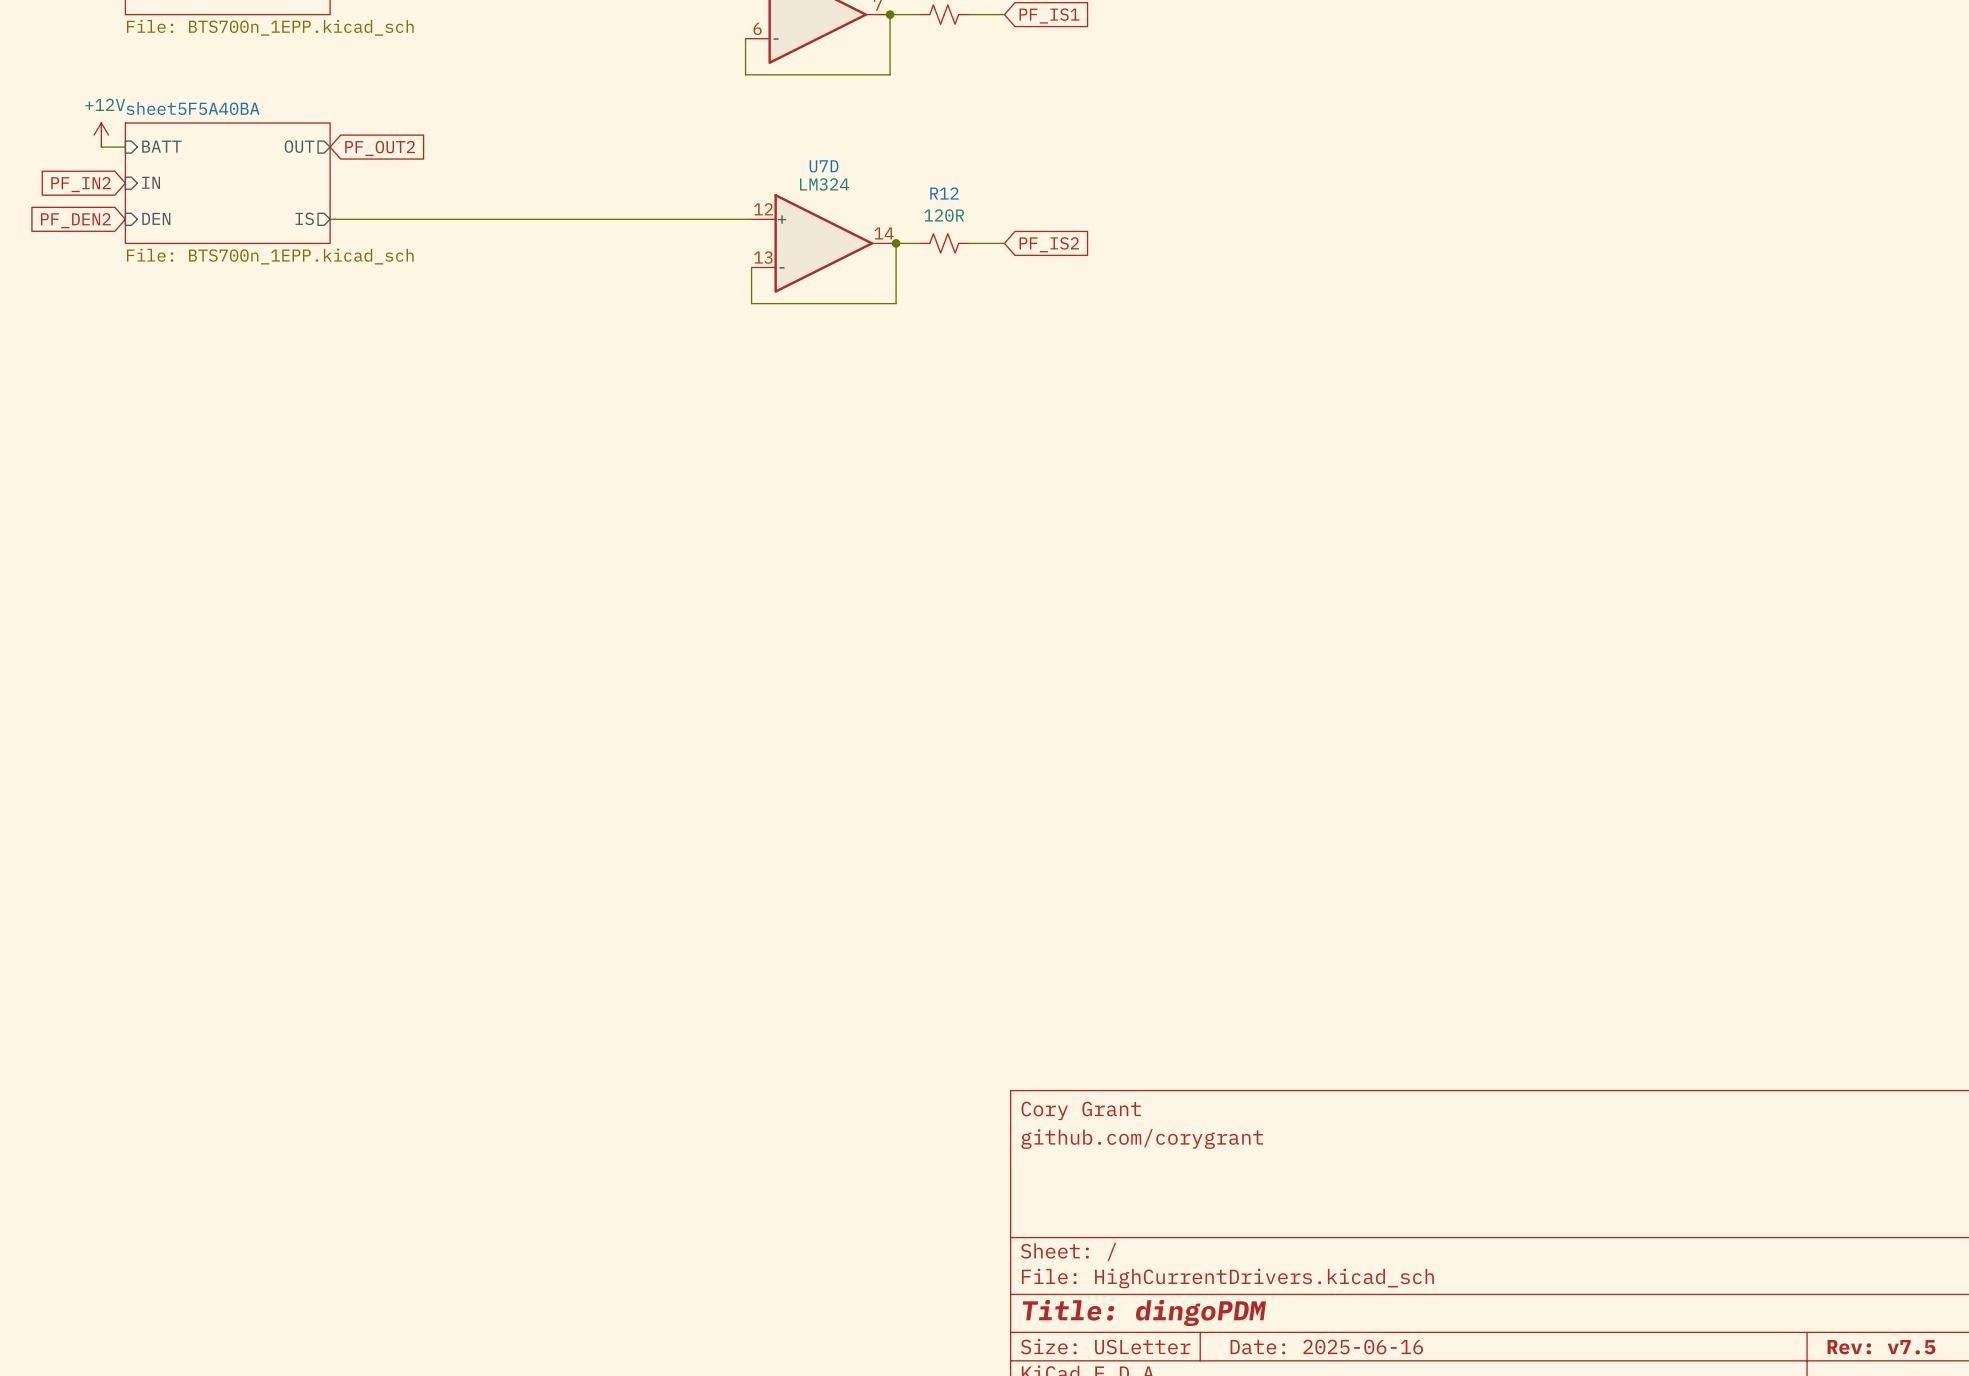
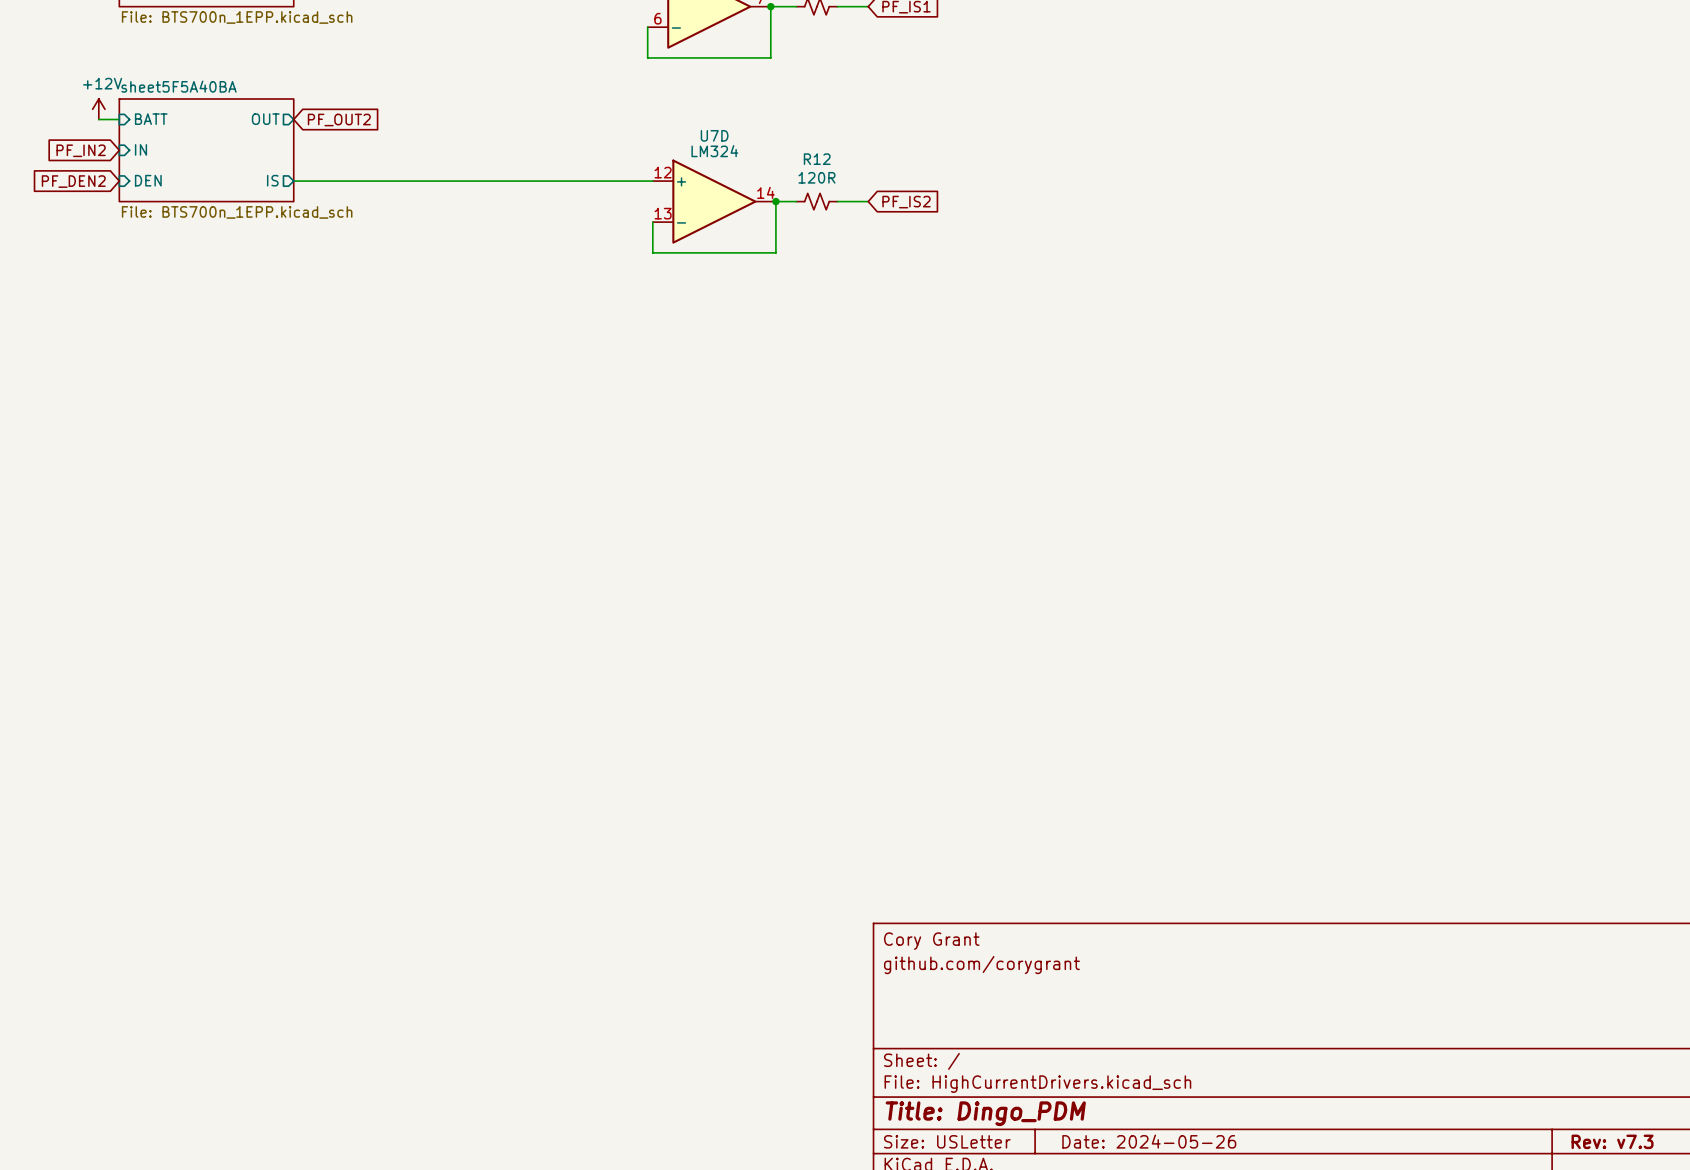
title block: Title: dingoPDM (1144, 1312) -> Title: Dingo_PDM (985, 1113)
title block: Date: 2025-06-16 (1326, 1347) -> Date: 2024-05-26 (1149, 1141)
title block: Rev: v7.5 (1881, 1347) -> Rev: v7.3 (1612, 1141)

